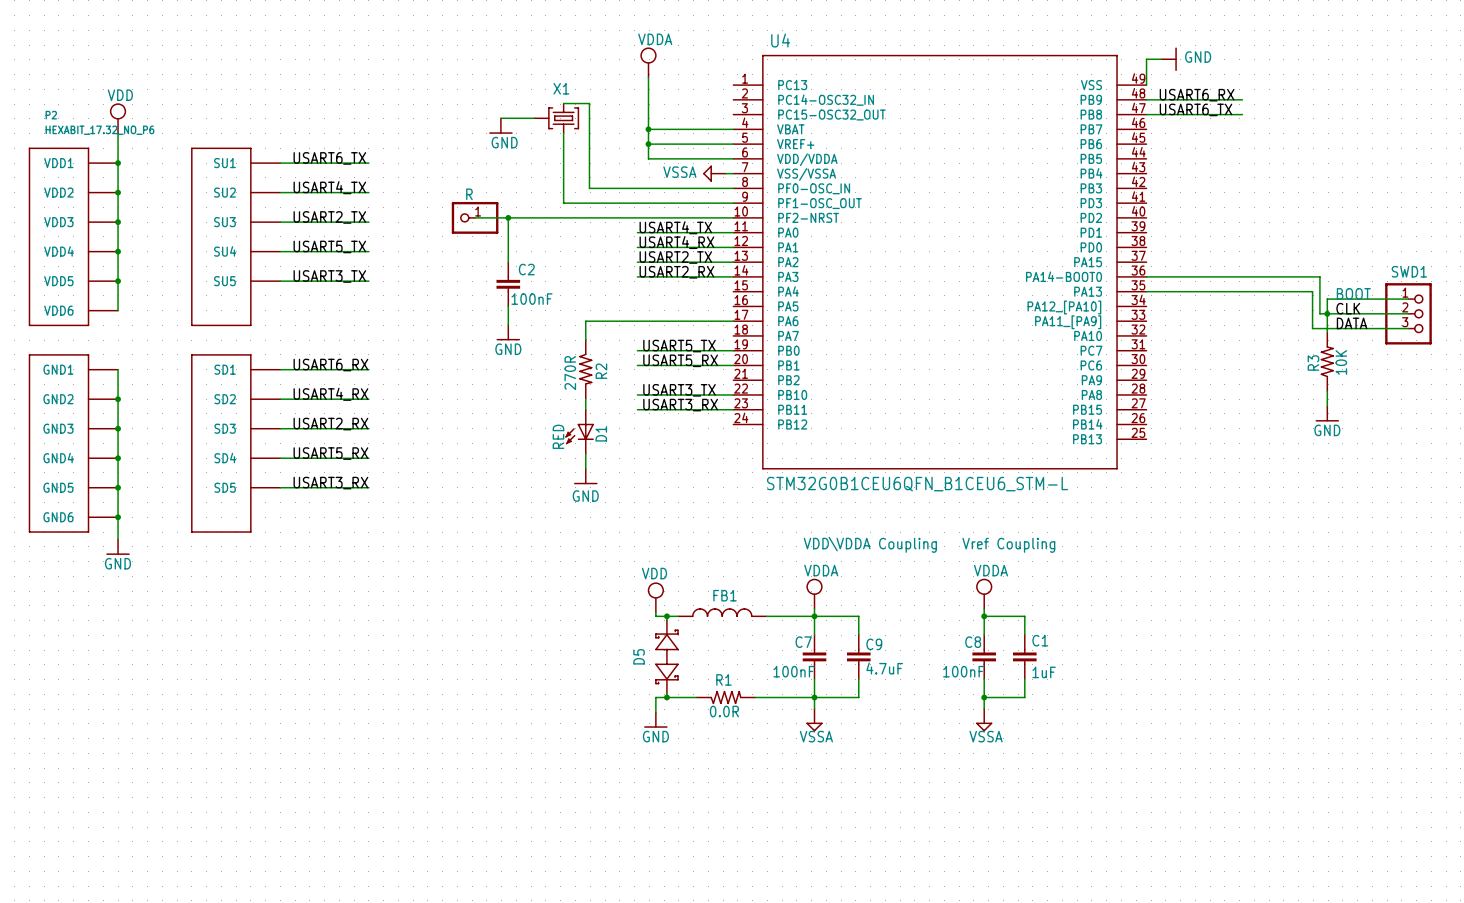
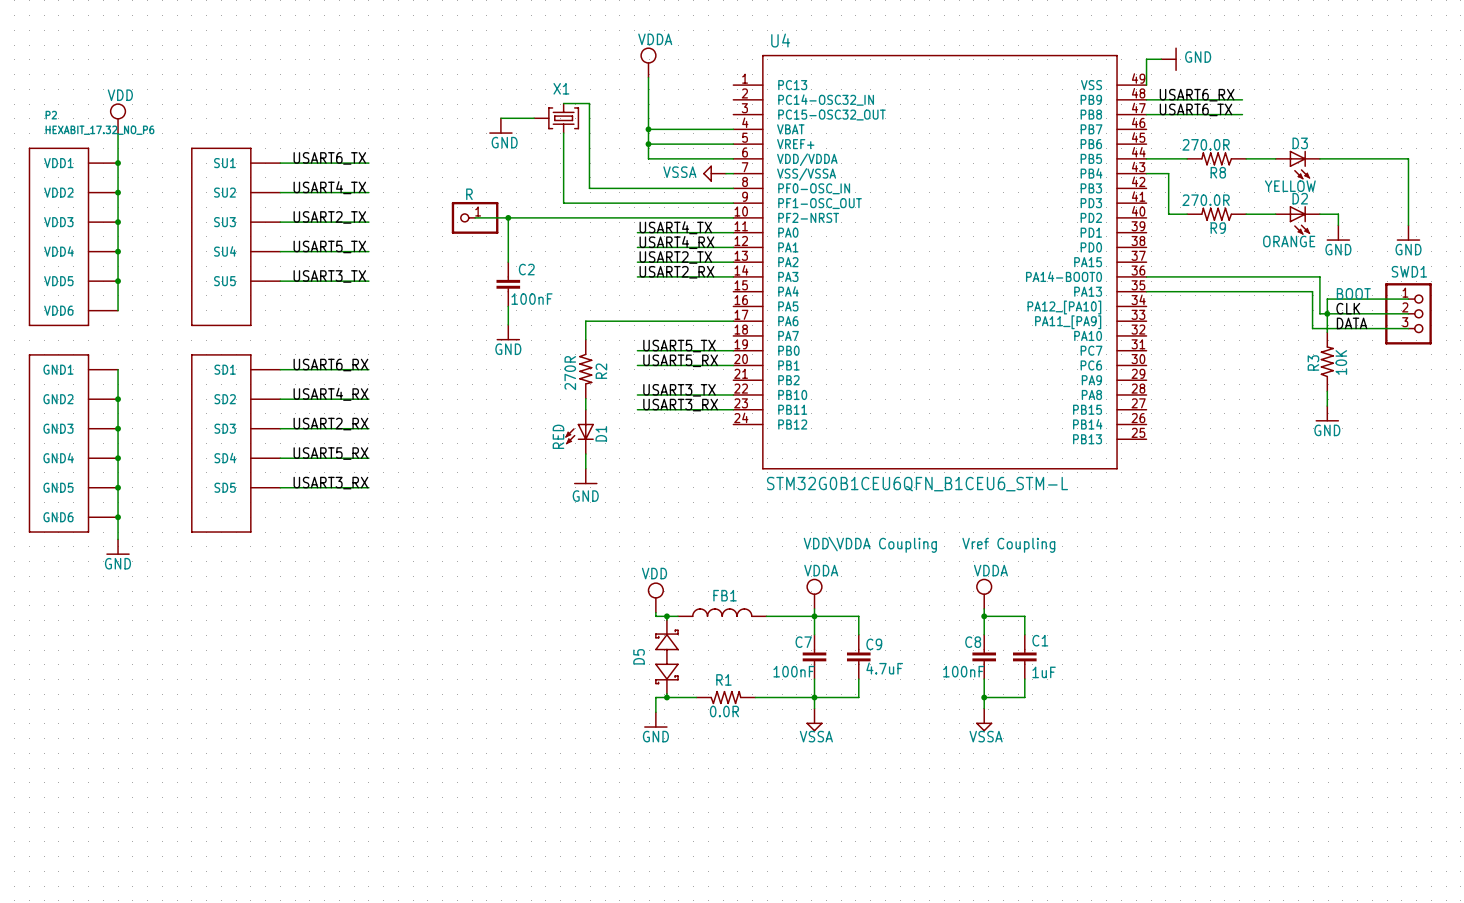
wire: none -> (1146, 158) (1187, 158)
R8: none -> 270.0R (1216, 158)
wire: none -> (1246, 158) (1275, 158)
wire: none -> (1319, 158) (1408, 158) (1408, 225)
D3: none -> YELLOW (1297, 165)
wire: none -> (1146, 173) (1168, 173) (1168, 214) (1187, 214)
R9: none -> 270.0R (1216, 214)
wire: none -> (1246, 214) (1275, 214)
wire: none -> (1319, 214) (1338, 214) (1338, 225)
D2: none -> ORANGE (1297, 220)
power symbol: none -> GND (1338, 233)
power symbol: none -> GND (1408, 233)

